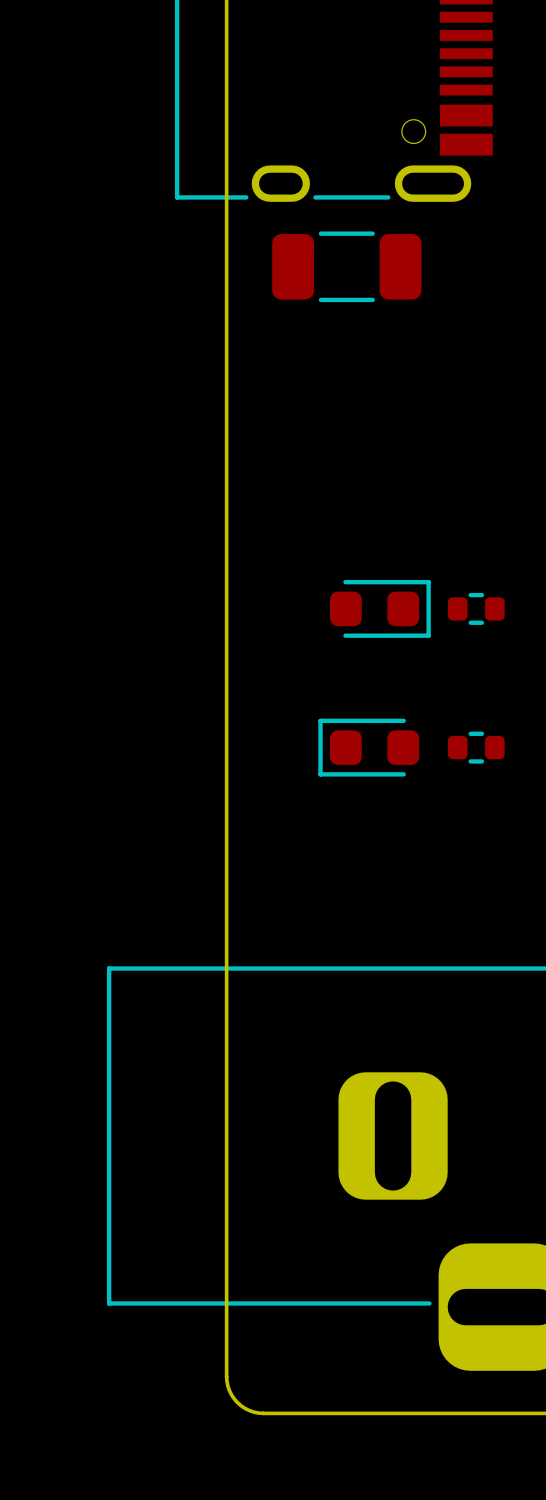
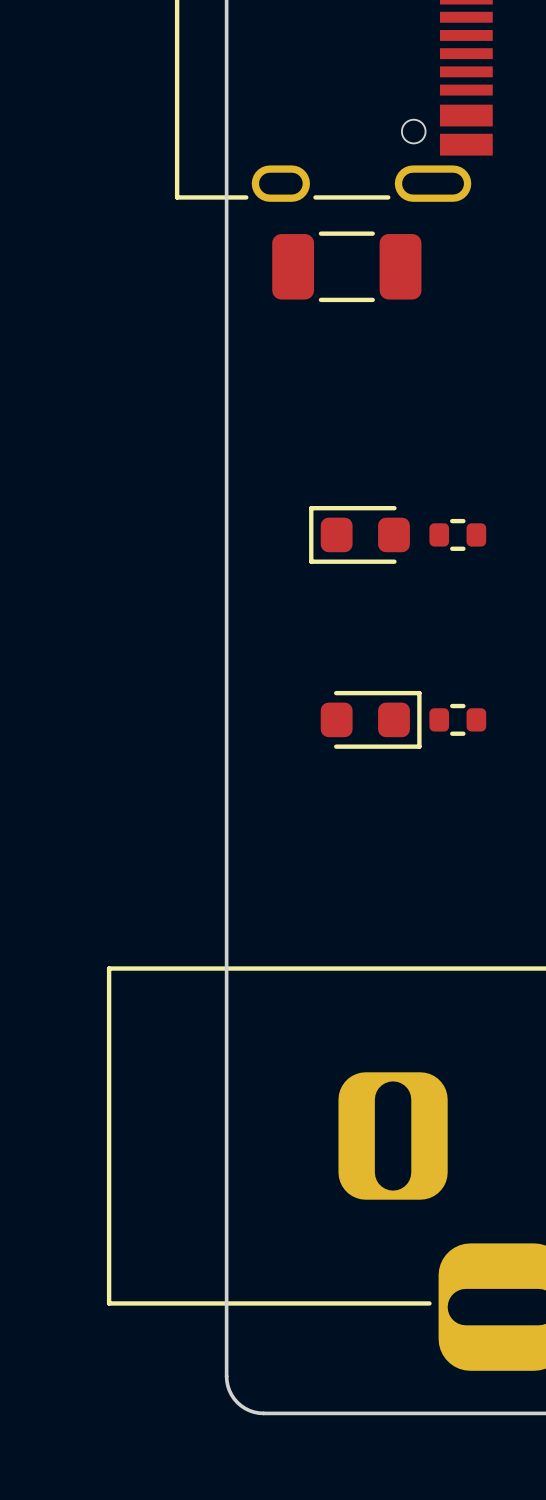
part rotation: 0° (380, 608) -> 180° (359, 534)
part position: (380, 608) -> (359, 534)
part position: (476, 608) -> (457, 534)
part rotation: 0° (368, 747) -> 180° (371, 719)
part position: (476, 747) -> (457, 719)

